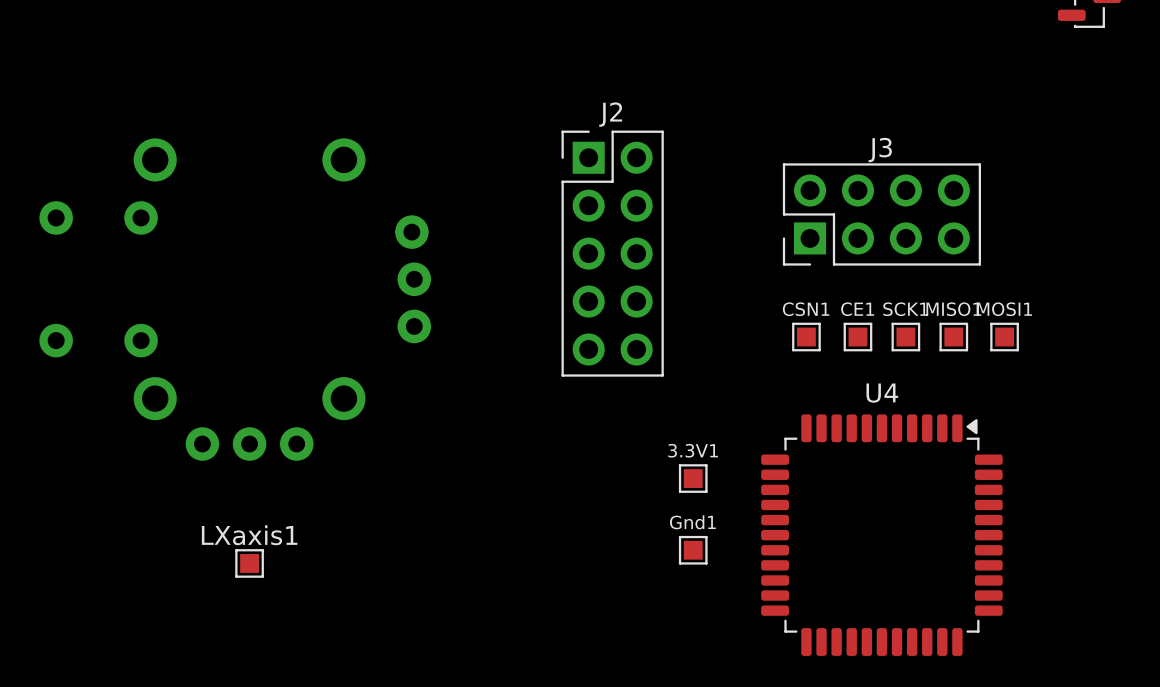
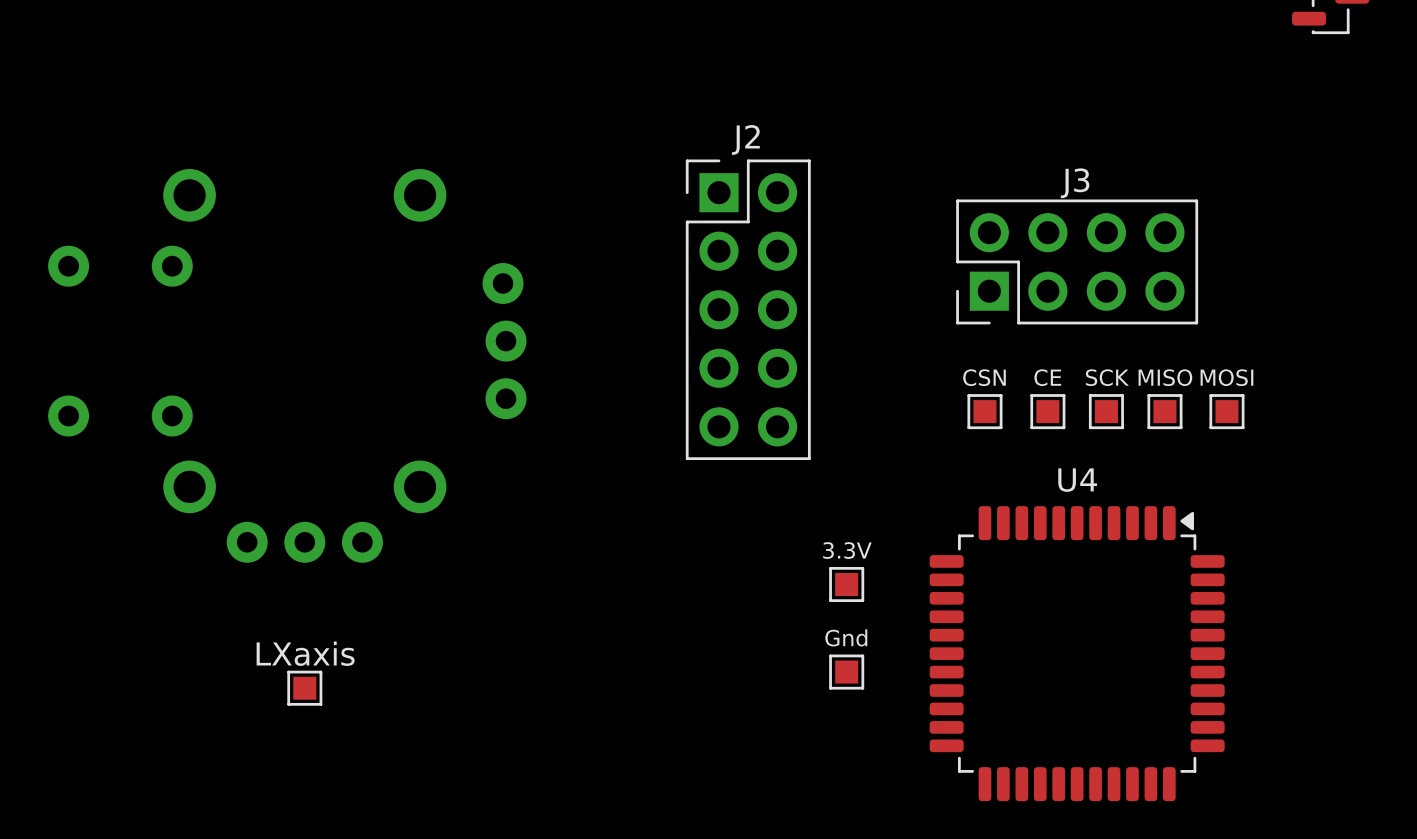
CSN1 name: CSN1 (806, 309) -> CSN (984, 377)
CE1 name: CE1 (857, 309) -> CE (1047, 377)
SCK1 name: SCK1 (905, 309) -> SCK (1107, 377)
MISO1 name: MISO1 (953, 309) -> MISO (1165, 377)
MOSI1 name: MOSI1 (1004, 309) -> MOSI (1226, 377)
3.3V1 name: 3.3V1 (693, 450) -> 3.3V (847, 550)
Gnd1 name: Gnd1 (692, 522) -> Gnd (846, 637)
LXaxis1 name: LXaxis1 (249, 535) -> LXaxis (305, 653)

